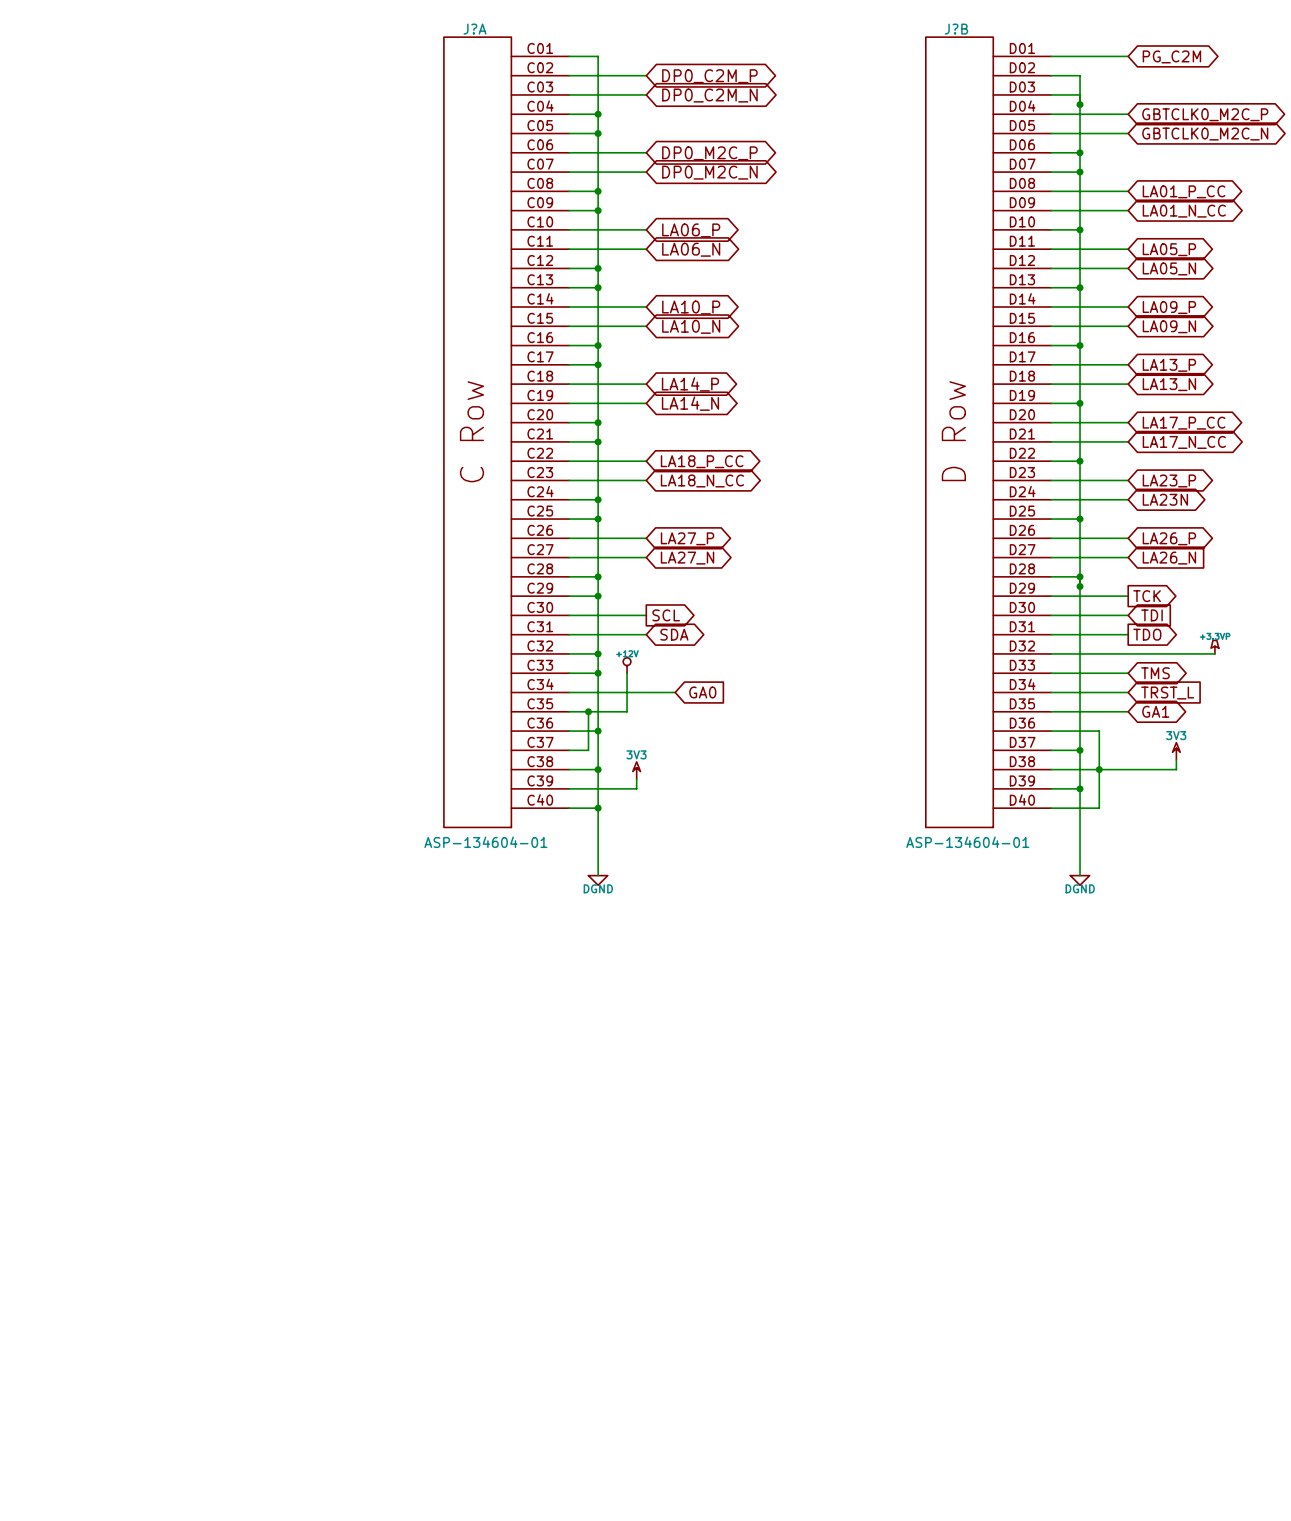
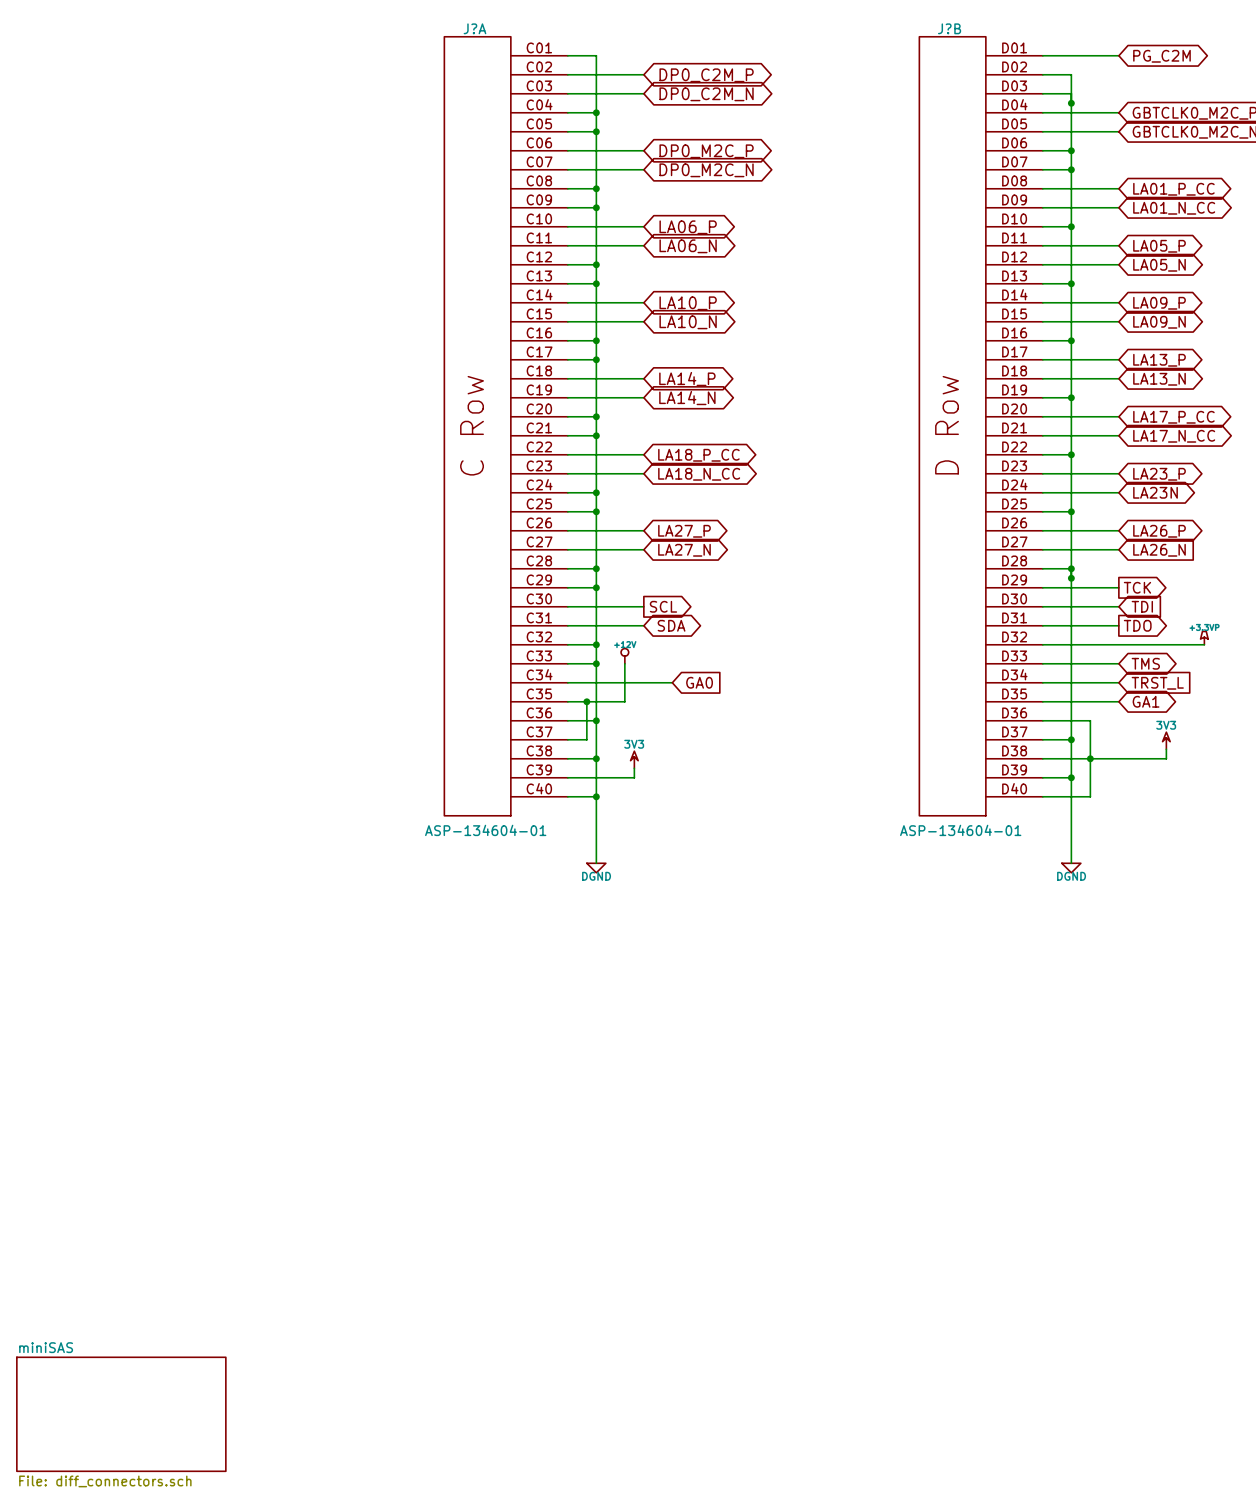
sheet miniSAS: none -> File: diff_connectors.sch (121, 1414)

